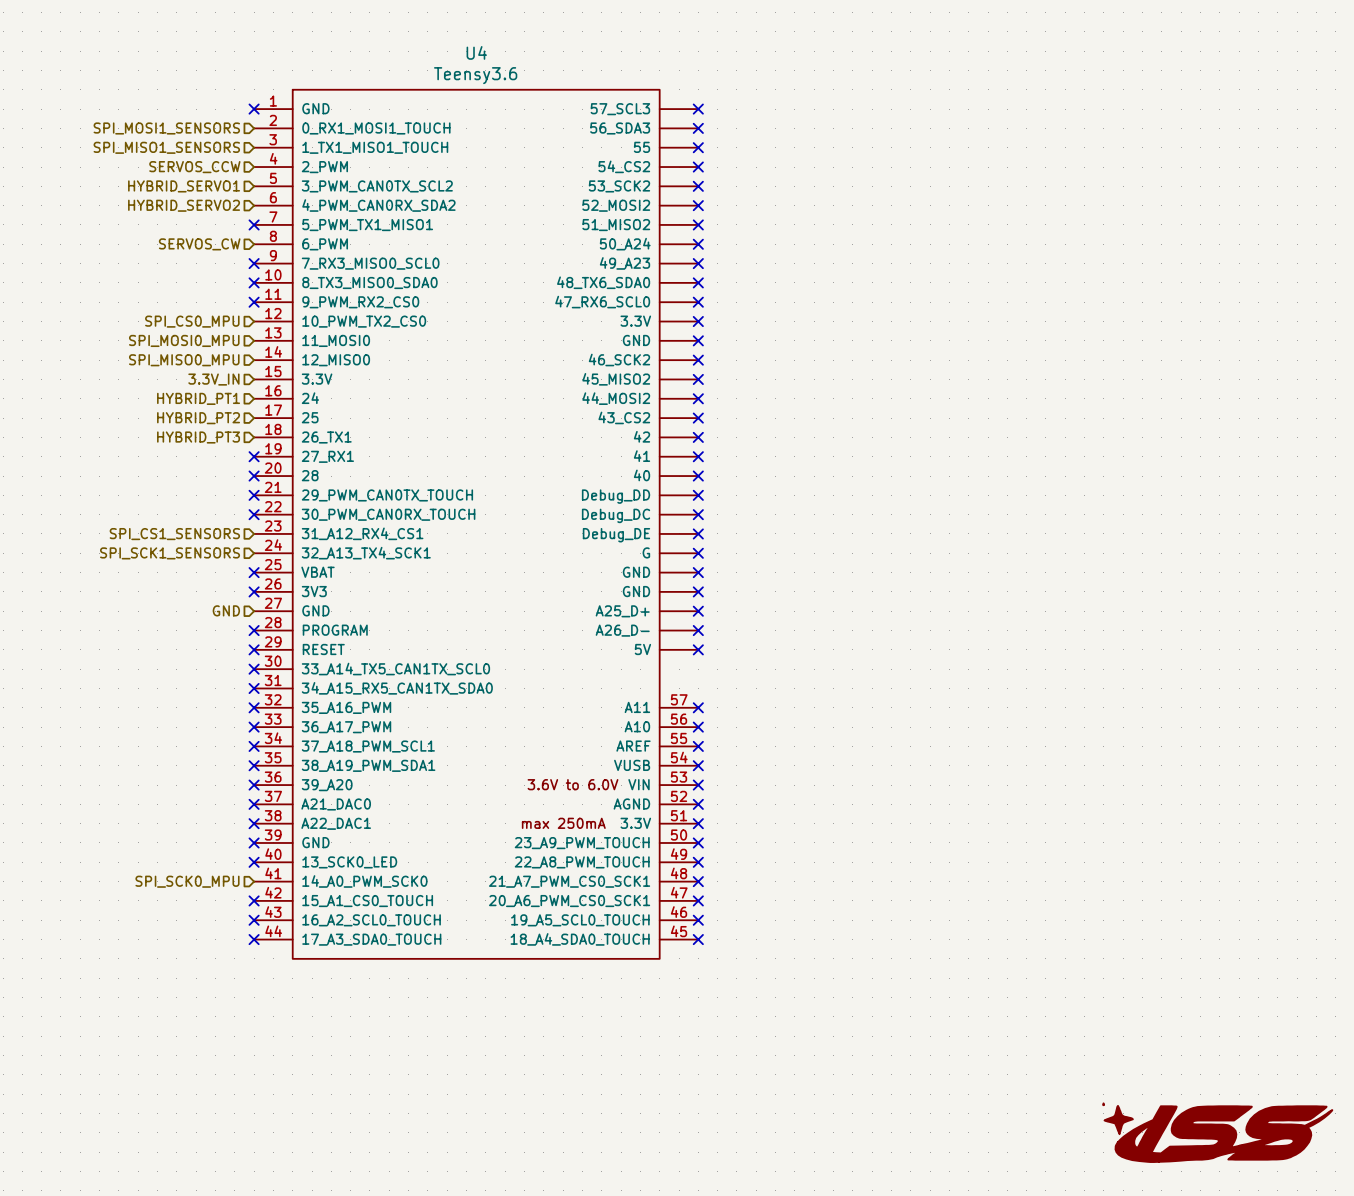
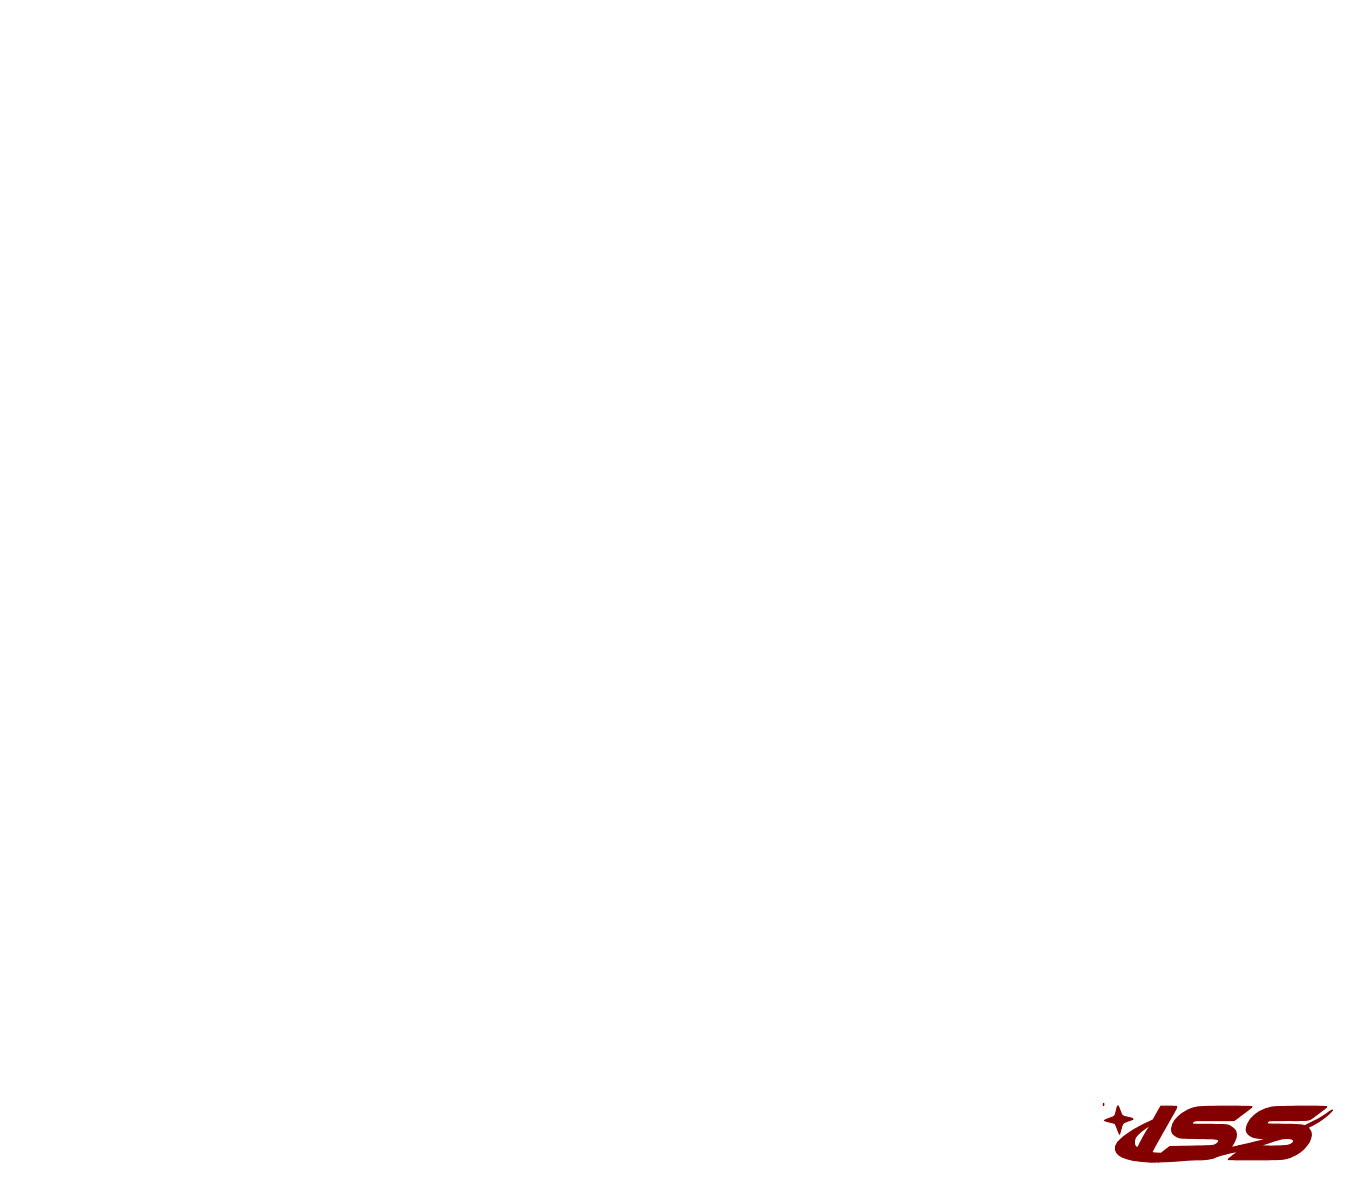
no-connect mark: (254, 109) -> none
no-connect mark: (698, 109) -> none
hierarchical label: SPI_MOSI1_SENSORS (166, 128) -> none
no-connect mark: (698, 128) -> none
hierarchical label: SPI_MISO1_SENSORS (166, 147) -> none
no-connect mark: (698, 147) -> none
hierarchical label: SERVOS_CCW (194, 167) -> none
no-connect mark: (698, 167) -> none
hierarchical label: HYBRID_SERVO1 (184, 186) -> none
no-connect mark: (698, 186) -> none
hierarchical label: HYBRID_SERVO2 (184, 205) -> none
no-connect mark: (698, 205) -> none
no-connect mark: (254, 224) -> none
no-connect mark: (698, 224) -> none
hierarchical label: SERVOS_CW (199, 244) -> none
no-connect mark: (698, 244) -> none
no-connect mark: (254, 263) -> none
no-connect mark: (698, 263) -> none
no-connect mark: (254, 282) -> none
no-connect mark: (698, 282) -> none
no-connect mark: (254, 302) -> none
no-connect mark: (698, 302) -> none
hierarchical label: SPI_CS0_MPU (192, 321) -> none
no-connect mark: (698, 321) -> none
hierarchical label: SPI_MOSI0_MPU (184, 340) -> none
no-connect mark: (698, 340) -> none
hierarchical label: SPI_MISO0_MPU (184, 360) -> none
no-connect mark: (698, 360) -> none
hierarchical label: 3.3V_IN (213, 379) -> none
no-connect mark: (698, 379) -> none
hierarchical label: HYBRID_PT1 (198, 398) -> none
no-connect mark: (698, 398) -> none
hierarchical label: HYBRID_PT2 (198, 418) -> none
no-connect mark: (698, 418) -> none
hierarchical label: HYBRID_PT3 (198, 437) -> none
no-connect mark: (698, 437) -> none
no-connect mark: (254, 456) -> none
no-connect mark: (698, 456) -> none
no-connect mark: (254, 476) -> none
no-connect mark: (698, 476) -> none
no-connect mark: (254, 495) -> none
no-connect mark: (698, 495) -> none
no-connect mark: (254, 514) -> none
no-connect mark: (698, 514) -> none
U4: Teensy3.6 (476, 524) -> none
no-connect mark: (698, 533) -> none
hierarchical label: SPI_CS1_SENSORS (174, 534) -> none
hierarchical label: SPI_SCK1_SENSORS (170, 553) -> none
no-connect mark: (698, 553) -> none
no-connect mark: (254, 572) -> none
no-connect mark: (698, 572) -> none
no-connect mark: (254, 591) -> none
no-connect mark: (698, 591) -> none
hierarchical label: GND (226, 610) -> none
no-connect mark: (698, 611) -> none
no-connect mark: (254, 630) -> none
no-connect mark: (698, 630) -> none
no-connect mark: (254, 649) -> none
no-connect mark: (698, 649) -> none
no-connect mark: (254, 669) -> none
no-connect mark: (254, 688) -> none
no-connect mark: (254, 707) -> none
no-connect mark: (698, 707) -> none
no-connect mark: (254, 727) -> none
no-connect mark: (698, 727) -> none
no-connect mark: (254, 746) -> none
no-connect mark: (698, 746) -> none
no-connect mark: (254, 765) -> none
no-connect mark: (698, 765) -> none
no-connect mark: (254, 785) -> none
no-connect mark: (698, 785) -> none
no-connect mark: (254, 804) -> none
no-connect mark: (698, 804) -> none
no-connect mark: (254, 823) -> none
no-connect mark: (698, 823) -> none
no-connect mark: (254, 842) -> none
no-connect mark: (698, 842) -> none
no-connect mark: (254, 862) -> none
no-connect mark: (698, 862) -> none
hierarchical label: SPI_SCK0_MPU (187, 881) -> none
no-connect mark: (698, 881) -> none
no-connect mark: (254, 900) -> none
no-connect mark: (698, 900) -> none
no-connect mark: (254, 920) -> none
no-connect mark: (698, 920) -> none
no-connect mark: (254, 939) -> none
no-connect mark: (698, 939) -> none

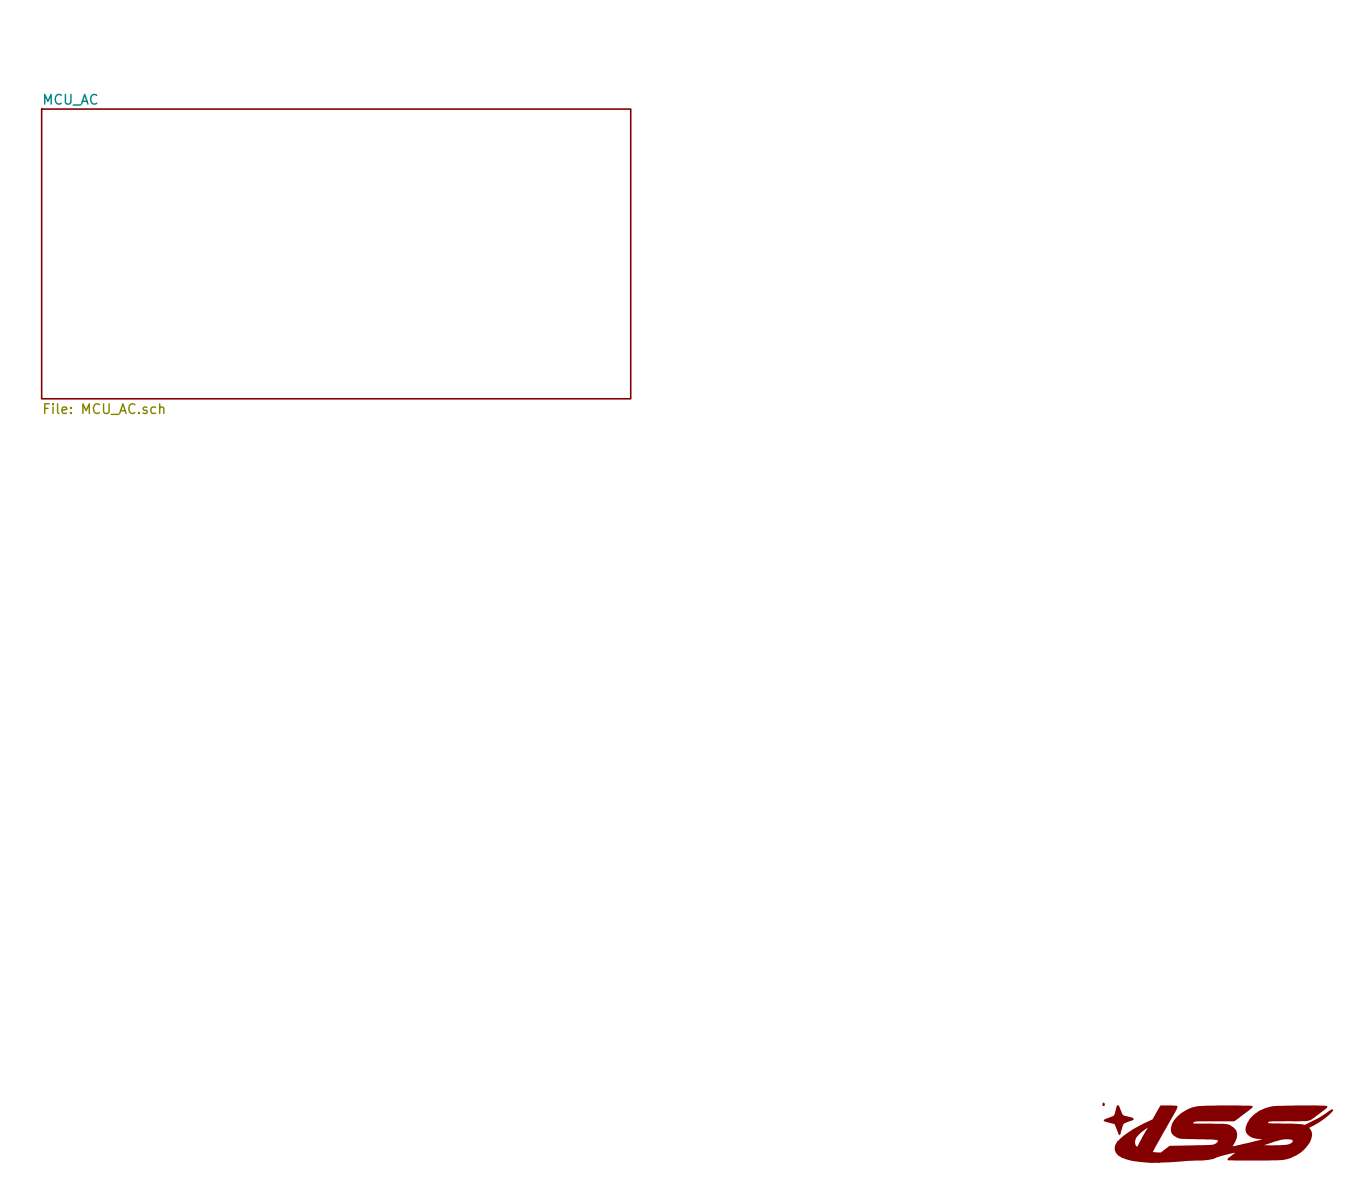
sheet MCU_AC: none -> File: MCU_AC.sch (336, 253)

